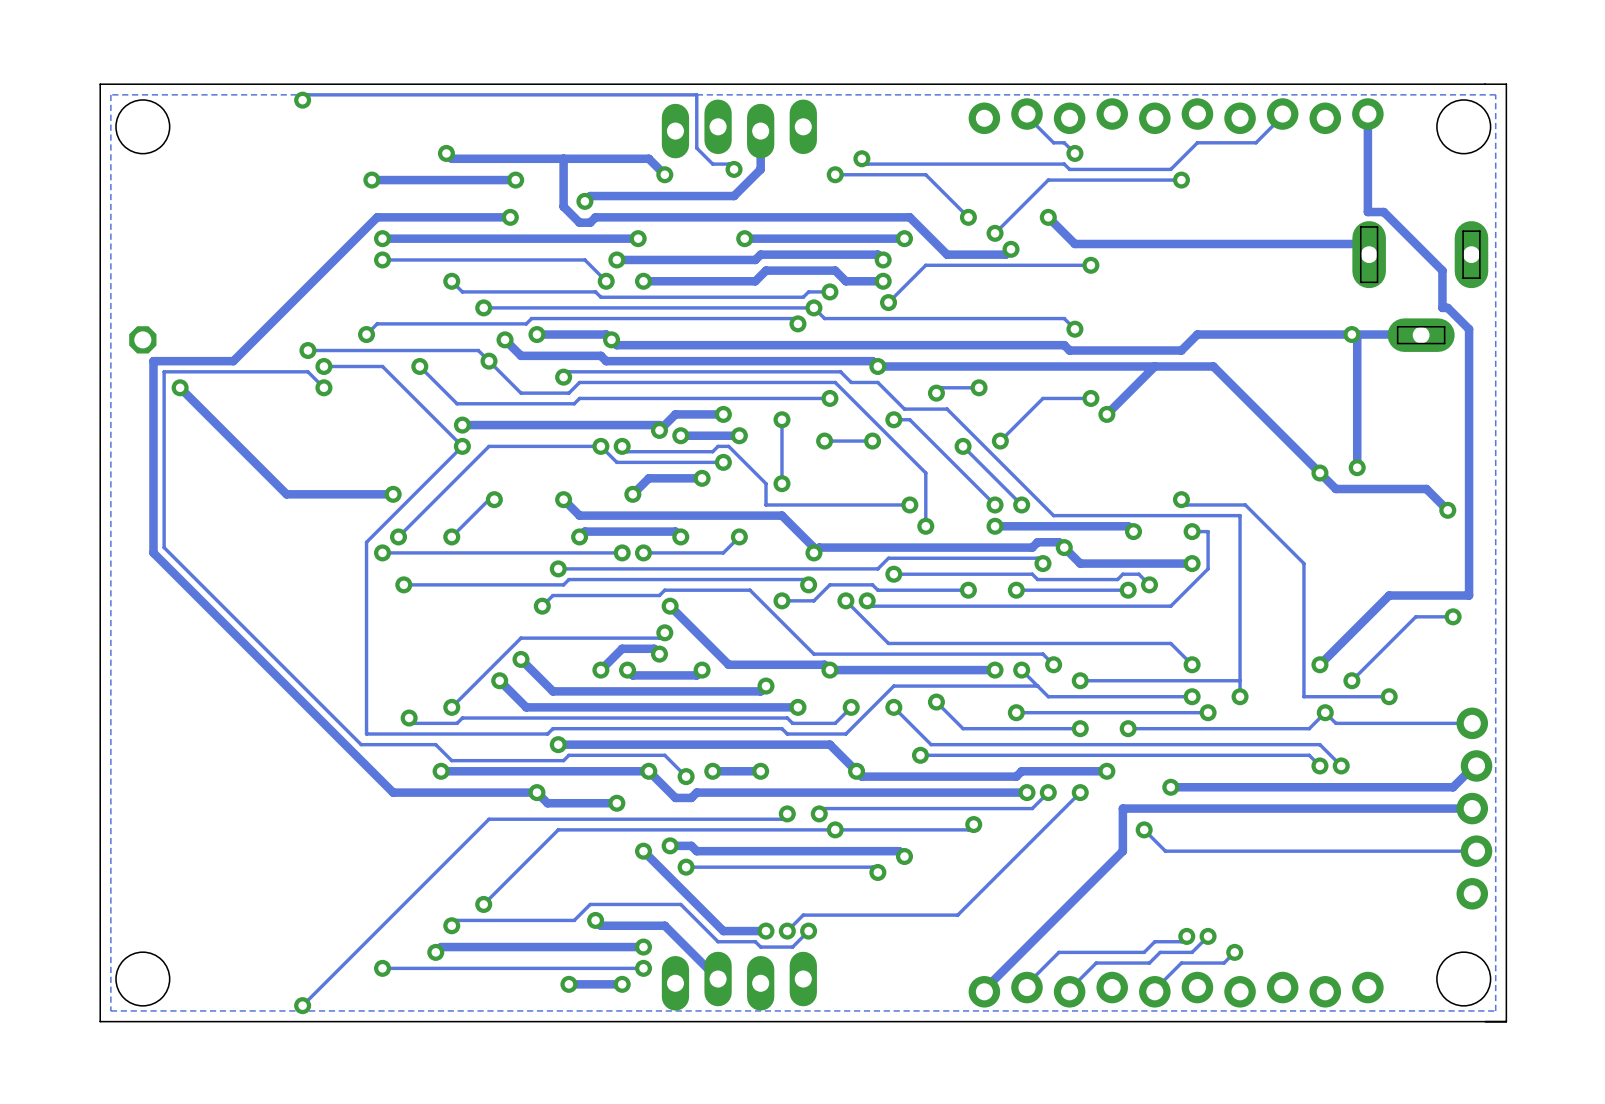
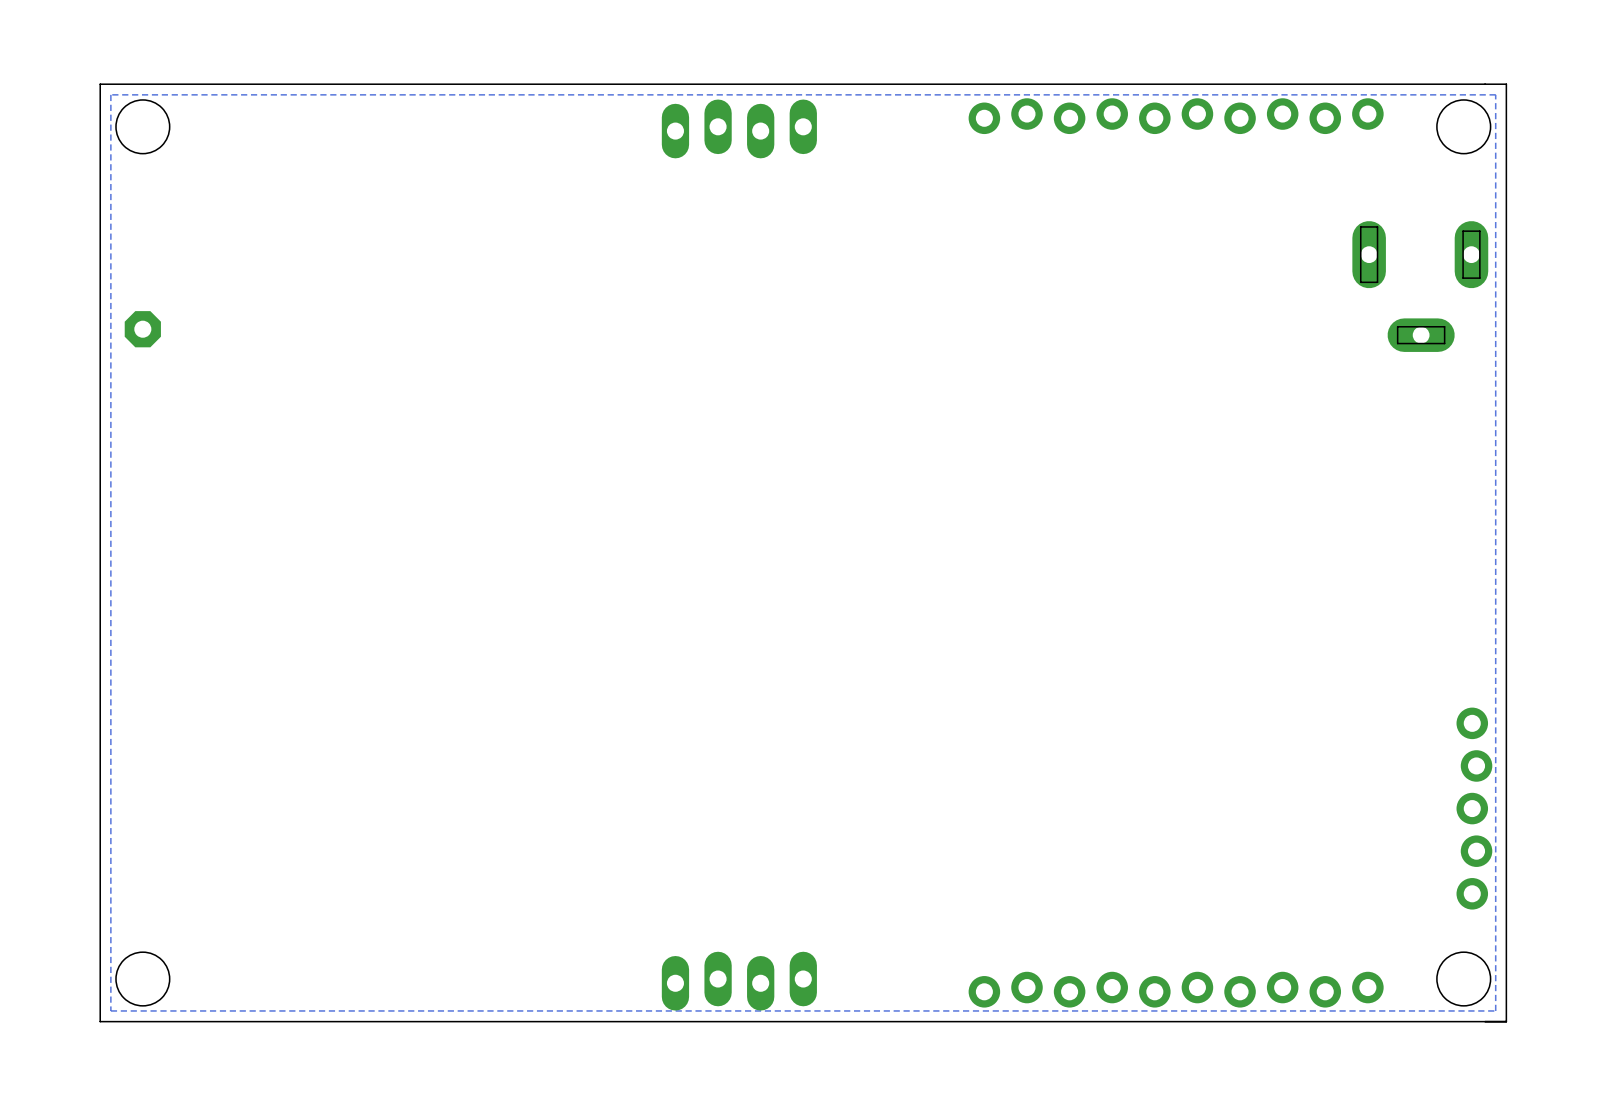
track: (302, 100) (307, 94) (696, 94) (696, 148) (712, 164) (728, 164) (734, 169) -> none
via: (302, 100) -> none
track: (1026, 114) (1053, 142) (1064, 142) (1074, 153) -> none
track: (1282, 114) (1256, 142) (1197, 142) (1170, 169) (1069, 169) (1064, 164) (867, 164) (861, 158) -> none
track: (1367, 114) (1367, 212) (1383, 212) (1442, 270) (1442, 307) (1447, 307) (1469, 329) (1469, 595) (1389, 595) (1319, 664) -> none
track: (760, 131) (760, 169) (734, 196) (590, 196) (584, 201) -> none
track: (446, 153) (451, 158) (648, 158) (664, 174) -> none
via: (446, 153) -> none
via: (1074, 153) -> none
track: (563, 158) (563, 206) (579, 222) (590, 222) (595, 217) (909, 217) (947, 254) (1005, 254) (1011, 249) -> none
via: (861, 158) -> none
via: (734, 169) -> none
via: (664, 174) -> none
track: (835, 174) (925, 174) (968, 217) -> none
via: (835, 174) -> none
via: (371, 180) -> none
track: (515, 180) (371, 180) -> none
via: (515, 180) -> none
track: (1181, 180) (1048, 180) (995, 233) -> none
via: (1181, 180) -> none
via: (584, 201) -> none
track: (510, 217) (377, 217) (233, 361) (153, 361) (153, 552) (393, 792) (536, 792) (547, 803) (616, 803) -> none
via: (510, 217) -> none
via: (968, 217) -> none
track: (1048, 217) (1074, 243) (1357, 243) (1369, 254) -> none
via: (1048, 217) -> none
via: (995, 233) -> none
via: (382, 238) -> none
track: (638, 238) (382, 238) -> none
via: (638, 238) -> none
via: (744, 238) -> none
track: (904, 238) (744, 238) -> none
via: (904, 238) -> none
via: (1011, 249) -> none
track: (382, 259) (584, 259) (606, 281) -> none
via: (382, 259) -> none
via: (616, 259) -> none
track: (883, 259) (877, 254) (760, 254) (755, 259) (616, 259) -> none
via: (883, 259) -> none
track: (1090, 265) (925, 265) (888, 302) -> none
via: (1090, 265) -> none
track: (451, 281) (462, 291) (595, 291) (600, 297) (803, 297) (808, 291) (829, 291) -> none
via: (451, 281) -> none
via: (606, 281) -> none
via: (643, 281) -> none
track: (883, 281) (845, 281) (835, 270) (766, 270) (755, 281) (643, 281) -> none
via: (883, 281) -> none
via: (829, 291) -> none
via: (888, 302) -> none
track: (483, 307) (813, 307) (824, 318) (1064, 318) (1074, 329) -> none
via: (483, 307) -> none
via: (813, 307) -> none
track: (797, 323) (792, 318) (531, 318) (526, 323) (377, 323) (366, 334) -> none
via: (797, 323) -> none
part footprint: [129, 326, 157, 354] -> [124, 311, 161, 348]
via: (1074, 329) -> none
via: (366, 334) -> none
track: (536, 334) (606, 334) (616, 345) (1064, 345) (1069, 350) (1181, 350) (1197, 334) (1421, 335) -> none
via: (536, 334) -> none
via: (1351, 334) -> none
track: (1357, 334) (1357, 467) -> none
track: (505, 339) (521, 355) (600, 355) (606, 361) (872, 361) (877, 366) (1213, 366) (1335, 489) (1426, 489) (1447, 510) -> none
via: (505, 339) -> none
via: (611, 339) -> none
track: (307, 350) (478, 350) (521, 393) (568, 393) (579, 382) (835, 382) (925, 473) (925, 526) -> none
via: (307, 350) -> none
via: (489, 361) -> none
track: (323, 366) (382, 366) (462, 446) (366, 542) (366, 734) (547, 734) (552, 728) (781, 728) (787, 734) (845, 734) (893, 686) (1037, 686) -> none
via: (323, 366) -> none
track: (419, 366) (457, 403) (574, 403) (579, 398) (829, 398) -> none
via: (419, 366) -> none
via: (877, 366) -> none
track: (1154, 366) (1106, 414) -> none
track: (563, 377) (568, 371) (840, 371) (851, 382) (877, 382) (904, 409) (947, 409) (1053, 515) (1240, 515) (1240, 696) -> none
via: (563, 377) -> none
track: (180, 387) (286, 494) (393, 494) -> none
via: (180, 387) -> none
track: (323, 387) (307, 371) (164, 371) (164, 547) (361, 744) (435, 744) (451, 760) (563, 760) (568, 755) (664, 755) (686, 776) -> none
via: (323, 387) -> none
track: (979, 387) (941, 387) (936, 393) -> none
via: (979, 387) -> none
via: (936, 393) -> none
via: (829, 398) -> none
track: (1090, 398) (1042, 398) (1000, 441) -> none
via: (1090, 398) -> none
track: (723, 414) (675, 414) (659, 430) (659, 425) (462, 425) -> none
via: (723, 414) -> none
via: (1106, 414) -> none
track: (781, 419) (781, 483) -> none
via: (781, 419) -> none
track: (893, 419) (909, 419) (995, 504) -> none
via: (893, 419) -> none
via: (462, 425) -> none
via: (659, 430) -> none
via: (680, 435) -> none
track: (739, 435) (680, 435) -> none
via: (739, 435) -> none
via: (824, 441) -> none
track: (872, 441) (824, 441) -> none
via: (872, 441) -> none
via: (1000, 441) -> none
via: (462, 446) -> none
via: (600, 446) -> none
track: (622, 446) (627, 451) (712, 451) (718, 446) (728, 446) (766, 483) (766, 504) (909, 504) -> none
via: (622, 446) -> none
track: (963, 446) (1021, 504) -> none
via: (963, 446) -> none
track: (723, 462) (616, 462) (600, 446) (489, 446) (398, 536) -> none
via: (723, 462) -> none
via: (1357, 467) -> none
via: (1319, 473) -> none
track: (702, 478) (648, 478) (632, 494) -> none
via: (702, 478) -> none
via: (781, 483) -> none
via: (393, 494) -> none
via: (632, 494) -> none
track: (494, 499) (489, 499) (451, 536) -> none
via: (494, 499) -> none
track: (563, 499) (579, 515) (781, 515) (813, 547) (813, 552) (819, 547) (1032, 547) (1037, 542) (1058, 542) (1080, 563) (1192, 563) -> none
via: (563, 499) -> none
track: (1181, 499) (1186, 504) (1245, 504) (1303, 563) (1303, 696) (1389, 696) -> none
via: (1181, 499) -> none
via: (909, 504) -> none
via: (995, 504) -> none
via: (1021, 504) -> none
via: (1447, 510) -> none
via: (925, 526) -> none
track: (995, 526) (1128, 526) (1133, 531) -> none
via: (995, 526) -> none
via: (1133, 531) -> none
track: (1192, 531) (1208, 531) (1208, 568) (1170, 606) (872, 606) (867, 600) -> none
via: (1192, 531) -> none
via: (398, 536) -> none
via: (451, 536) -> none
via: (579, 536) -> none
track: (680, 536) (675, 531) (584, 531) (579, 536) -> none
via: (680, 536) -> none
track: (739, 536) (723, 552) (643, 552) -> none
via: (739, 536) -> none
via: (1064, 547) -> none
via: (382, 552) -> none
track: (622, 552) (382, 552) -> none
via: (622, 552) -> none
via: (643, 552) -> none
via: (813, 552) -> none
track: (1042, 563) (1037, 558) (888, 558) (877, 568) (558, 568) -> none
via: (1042, 563) -> none
via: (1192, 563) -> none
via: (558, 568) -> none
track: (893, 574) (1032, 574) (1037, 579) (1117, 579) (1122, 574) (1138, 574) (1149, 584) -> none
via: (893, 574) -> none
via: (403, 584) -> none
track: (808, 584) (803, 579) (568, 579) (563, 584) (403, 584) -> none
via: (808, 584) -> none
via: (1149, 584) -> none
track: (968, 590) (877, 590) (872, 584) (829, 584) (813, 600) (781, 600) -> none
via: (968, 590) -> none
via: (1016, 590) -> none
track: (1128, 590) (1016, 590) -> none
via: (1128, 590) -> none
via: (781, 600) -> none
track: (845, 600) (888, 643) (1170, 643) (1192, 664) -> none
via: (845, 600) -> none
via: (867, 600) -> none
track: (542, 606) (552, 595) (659, 595) (664, 590) (750, 590) (813, 654) (1042, 654) (1053, 664) -> none
via: (542, 606) -> none
track: (670, 606) (728, 664) (824, 664) (829, 670) (995, 670) -> none
via: (670, 606) -> none
track: (1453, 616) (1415, 616) (1351, 680) -> none
via: (1453, 616) -> none
track: (664, 632) (659, 638) (521, 638) (451, 707) -> none
via: (664, 632) -> none
track: (659, 654) (654, 648) (622, 648) (600, 670) -> none
via: (659, 654) -> none
track: (521, 659) (552, 691) (760, 691) (766, 686) -> none
via: (521, 659) -> none
via: (1053, 664) -> none
via: (1192, 664) -> none
via: (1319, 664) -> none
via: (600, 670) -> none
via: (627, 670) -> none
track: (702, 670) (696, 675) (632, 675) (627, 670) -> none
via: (702, 670) -> none
via: (829, 670) -> none
via: (995, 670) -> none
track: (1021, 670) (1048, 696) (1192, 696) -> none
via: (1021, 670) -> none
track: (499, 680) (526, 707) (797, 707) -> none
via: (499, 680) -> none
via: (1080, 680) -> none
track: (1240, 680) (1080, 680) -> none
via: (1351, 680) -> none
via: (766, 686) -> none
via: (1192, 696) -> none
via: (1240, 696) -> none
via: (1389, 696) -> none
track: (936, 702) (963, 728) (1080, 728) -> none
via: (936, 702) -> none
via: (451, 707) -> none
via: (797, 707) -> none
track: (851, 707) (835, 723) (792, 723) (787, 718) (462, 718) (457, 723) (414, 723) (409, 718) -> none
via: (851, 707) -> none
track: (893, 707) (931, 744) (1319, 744) (1341, 765) -> none
via: (893, 707) -> none
via: (1016, 712) -> none
track: (1208, 712) (1016, 712) -> none
via: (1208, 712) -> none
via: (1325, 712) -> none
via: (409, 718) -> none
track: (1472, 723) (1335, 723) (1325, 712) (1309, 728) (1128, 728) -> none
via: (1080, 728) -> none
via: (1128, 728) -> none
track: (558, 744) (829, 744) (861, 776) (1016, 776) (1021, 771) (1106, 771) -> none
via: (558, 744) -> none
track: (920, 755) (1309, 755) (1319, 765) -> none
via: (920, 755) -> none
via: (1319, 765) -> none
via: (1341, 765) -> none
track: (1476, 765) (1453, 787) (1170, 787) -> none
track: (441, 771) (648, 771) (675, 797) (691, 797) (696, 792) (1026, 792) -> none
via: (441, 771) -> none
via: (648, 771) -> none
via: (712, 771) -> none
track: (760, 771) (712, 771) -> none
via: (760, 771) -> none
via: (856, 771) -> none
via: (1106, 771) -> none
via: (686, 776) -> none
via: (1170, 787) -> none
via: (536, 792) -> none
via: (1026, 792) -> none
track: (1048, 792) (1032, 808) (824, 808) (819, 813) -> none
via: (1048, 792) -> none
track: (1080, 792) (957, 915) (803, 915) (787, 931) -> none
via: (1080, 792) -> none
via: (616, 803) -> none
track: (1472, 808) (1122, 808) (1122, 851) (984, 991) -> none
track: (787, 813) (781, 819) (489, 819) (302, 1005) -> none
via: (787, 813) -> none
via: (819, 813) -> none
track: (973, 824) (968, 829) (558, 829) (483, 904) -> none
via: (973, 824) -> none
via: (835, 829) -> none
track: (1144, 829) (1165, 851) (1476, 851) -> none
via: (1144, 829) -> none
track: (670, 845) (691, 845) (696, 851) (899, 851) (904, 856) -> none
via: (670, 845) -> none
track: (643, 851) (723, 931) (766, 931) -> none
via: (643, 851) -> none
via: (904, 856) -> none
track: (686, 867) (872, 867) (877, 872) -> none
via: (686, 867) -> none
via: (877, 872) -> none
via: (483, 904) -> none
track: (595, 920) (600, 925) (664, 925) (718, 979) -> none
via: (595, 920) -> none
track: (451, 925) (457, 920) (574, 920) (590, 904) (680, 904) (718, 941) (755, 941) (760, 947) (792, 947) (808, 931) -> none
via: (451, 925) -> none
via: (766, 931) -> none
via: (787, 931) -> none
via: (808, 931) -> none
track: (1186, 936) (1181, 941) (1154, 941) (1144, 952) (1058, 952) (1026, 984) (1026, 987) -> none
via: (1186, 936) -> none
track: (1208, 936) (1192, 952) (1160, 952) (1149, 963) (1096, 963) (1069, 991) -> none
via: (1208, 936) -> none
track: (643, 947) (441, 947) (435, 952) -> none
via: (643, 947) -> none
via: (435, 952) -> none
track: (1234, 952) (1224, 963) (1181, 963) (1154, 991) -> none
via: (1234, 952) -> none
via: (382, 968) -> none
track: (643, 968) (382, 968) -> none
via: (643, 968) -> none
via: (568, 984) -> none
track: (622, 984) (568, 984) -> none
via: (622, 984) -> none
via: (302, 1005) -> none

